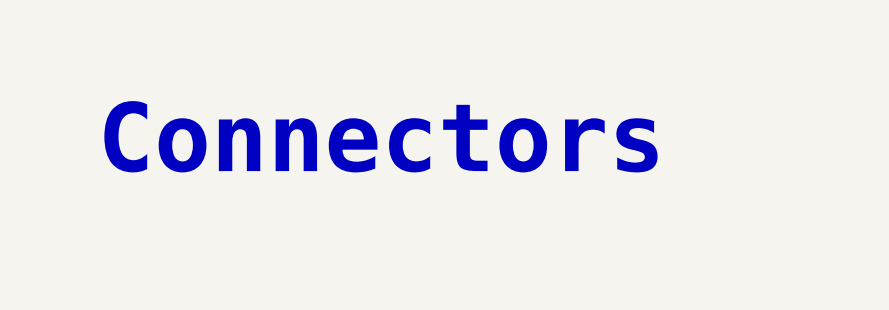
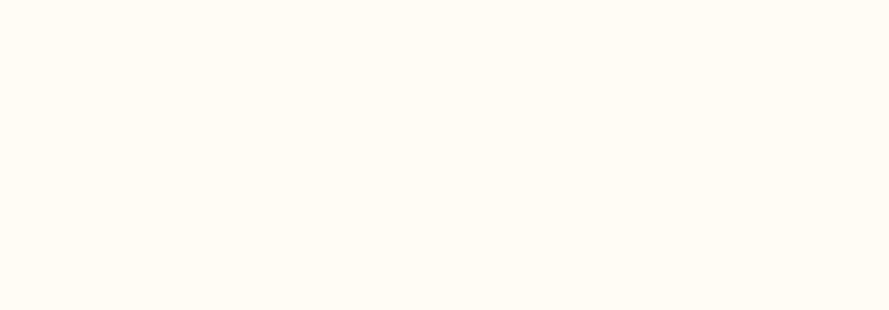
text: Connectors (380, 136) -> none

